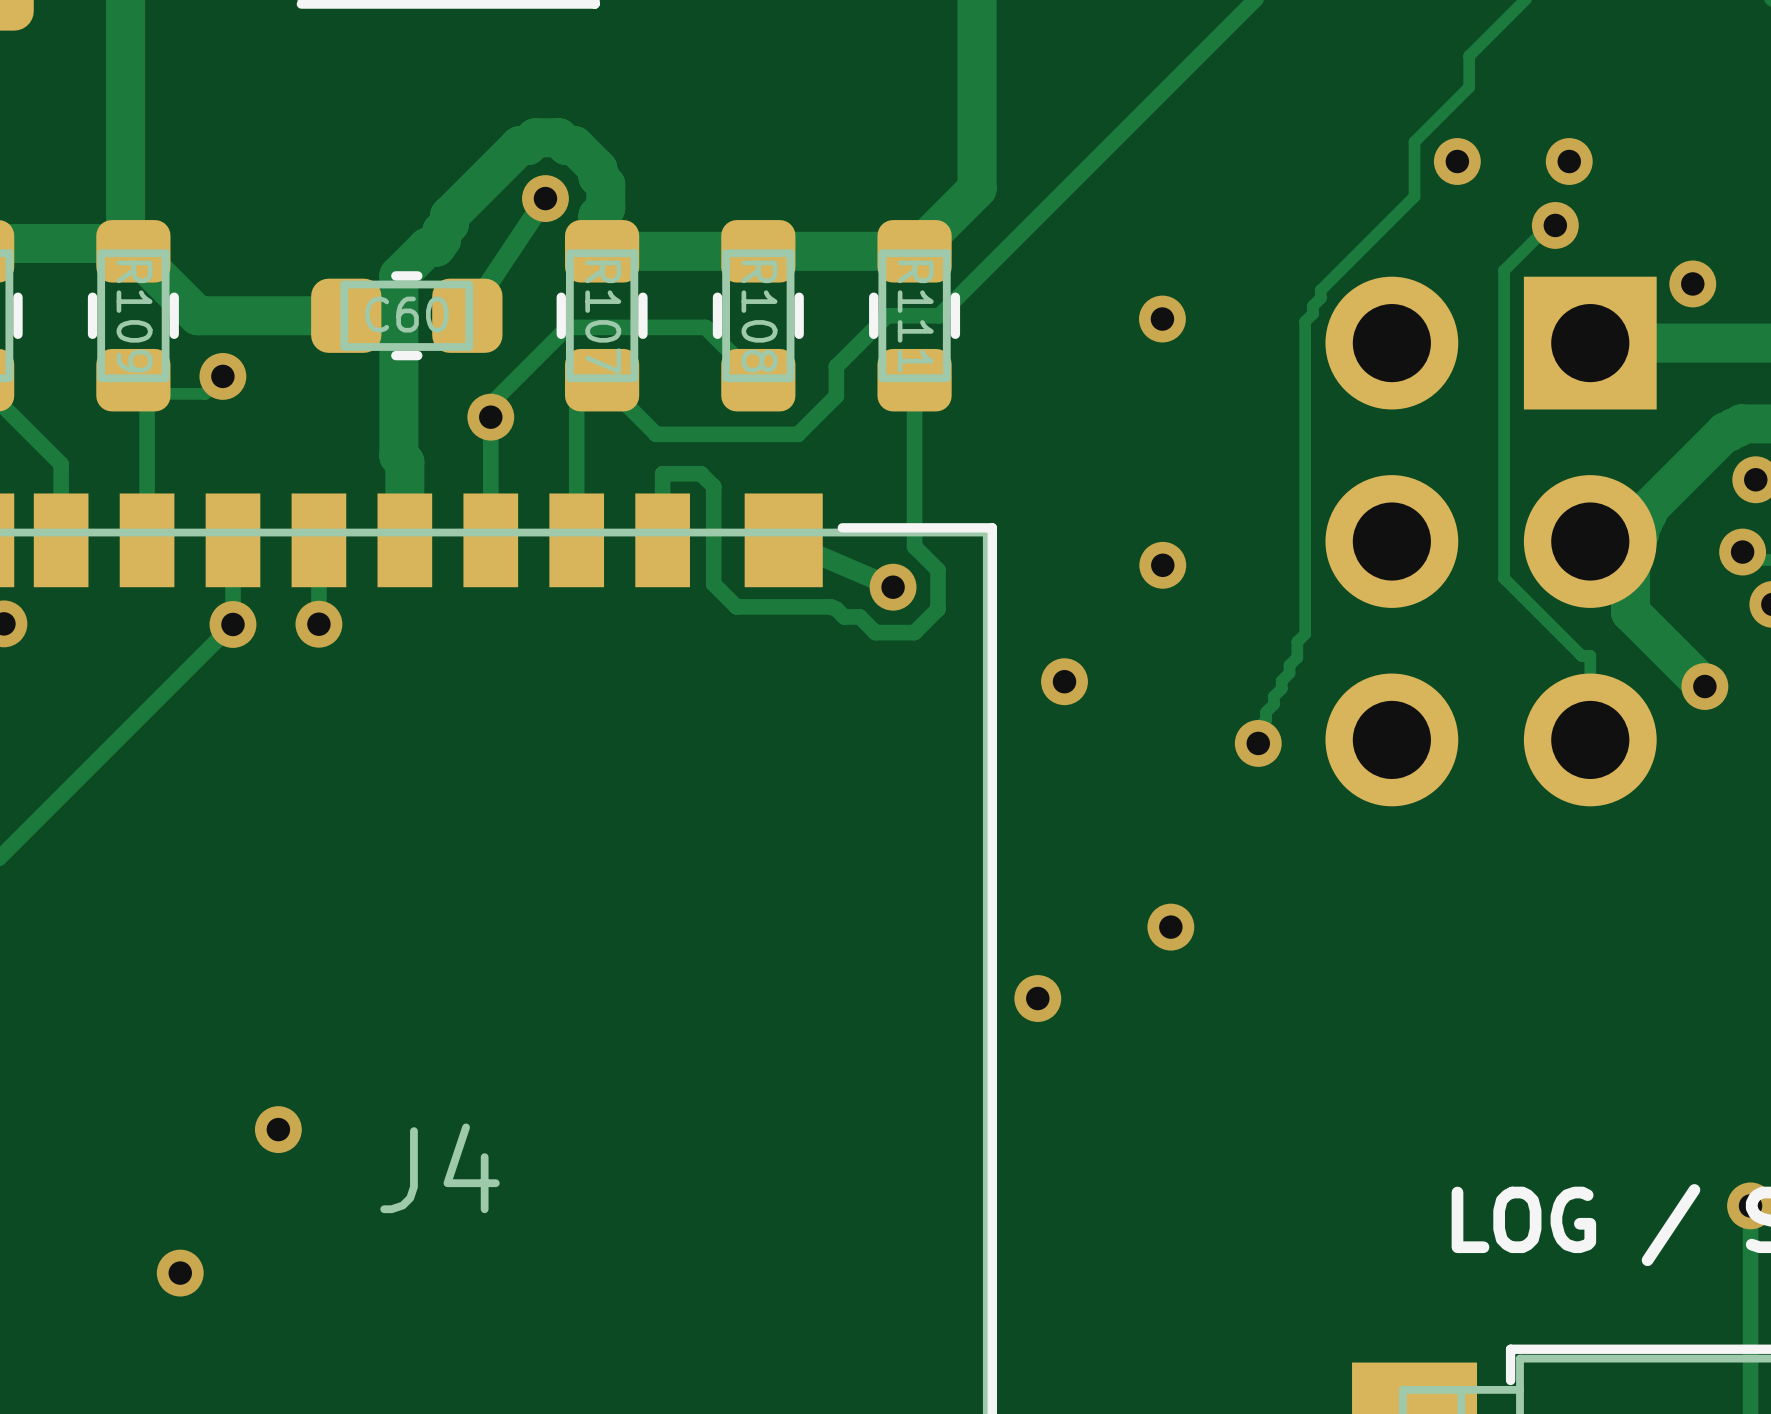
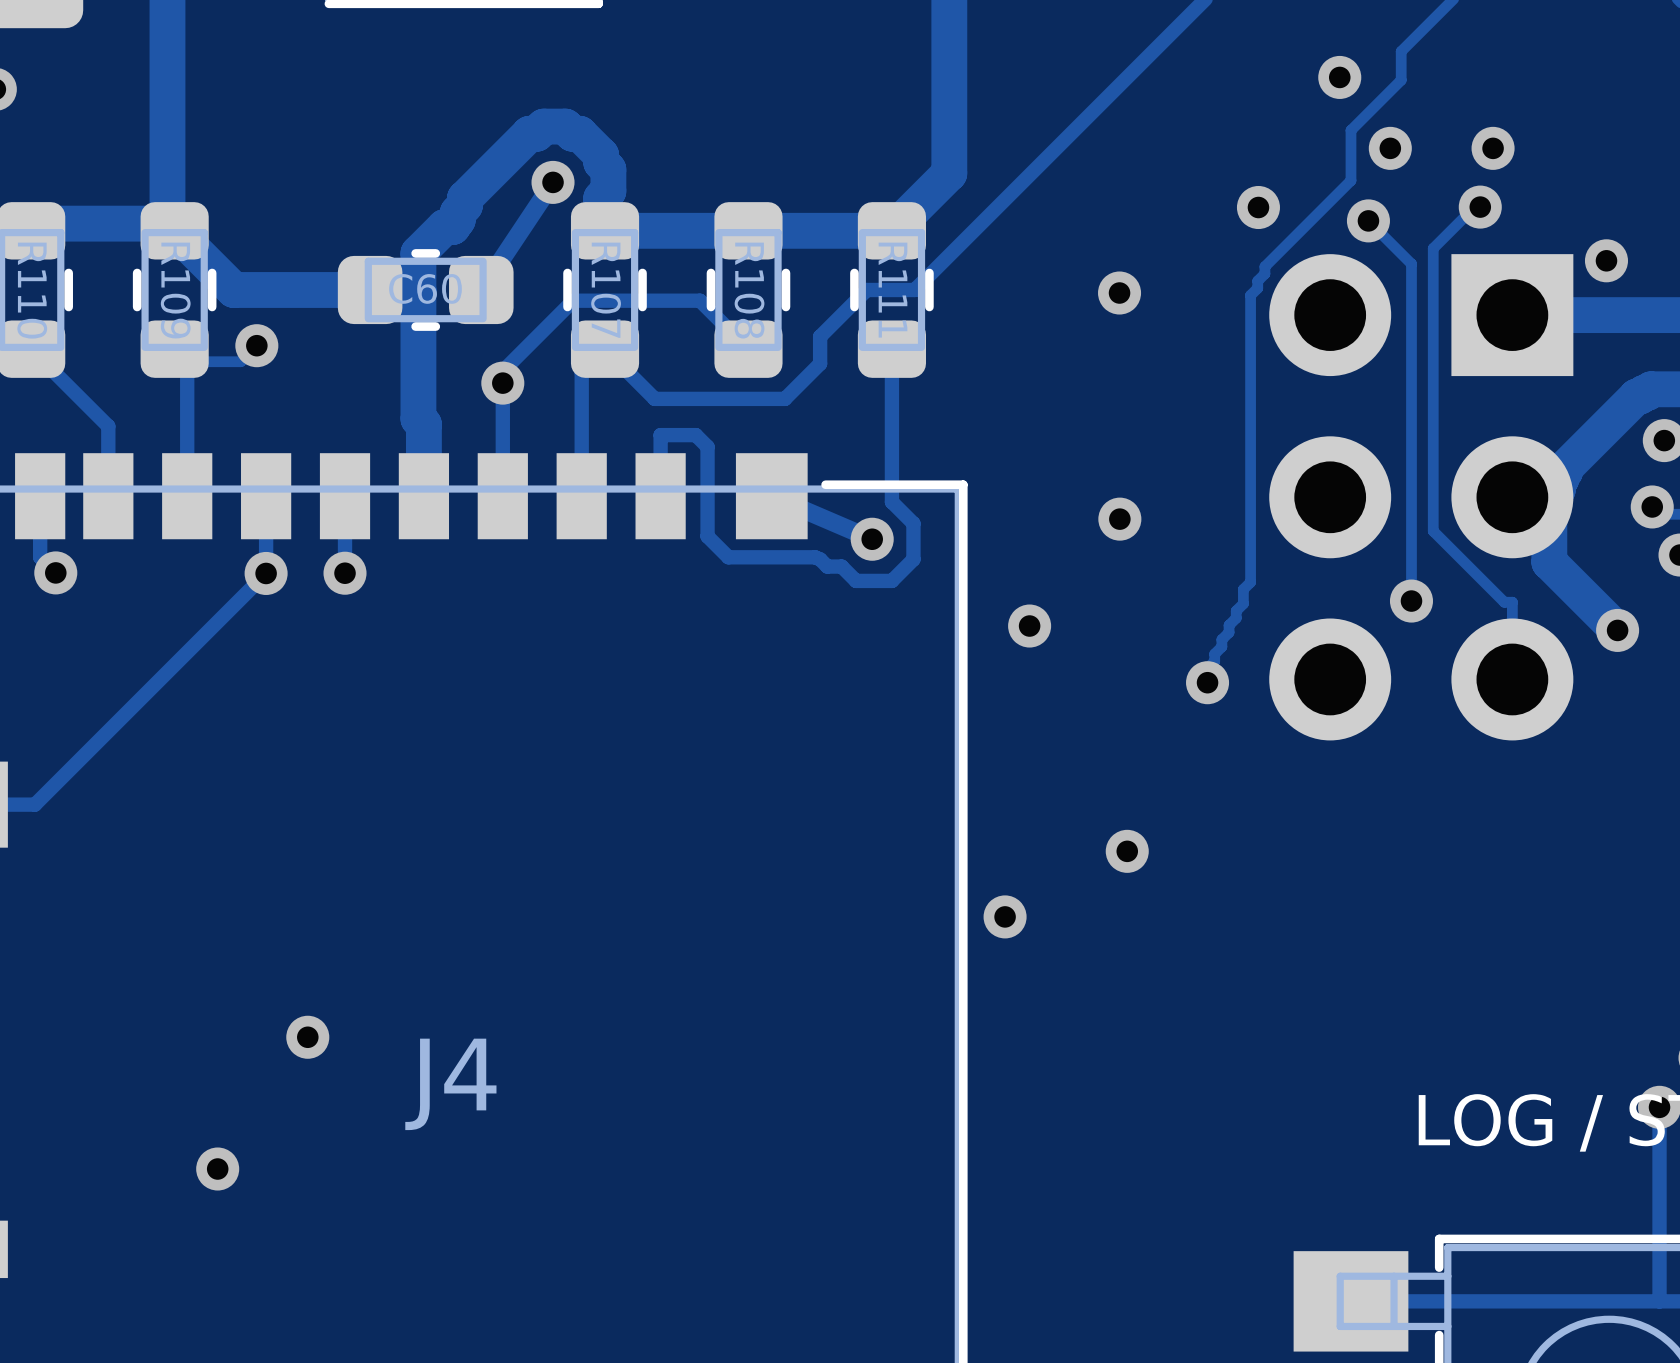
via: none -> (1339, 77)
via: none -> (1258, 207)
track: none -> (1368, 220) (1411, 263) (1411, 601)
via: none -> (1368, 220)
via: none -> (1411, 601)

